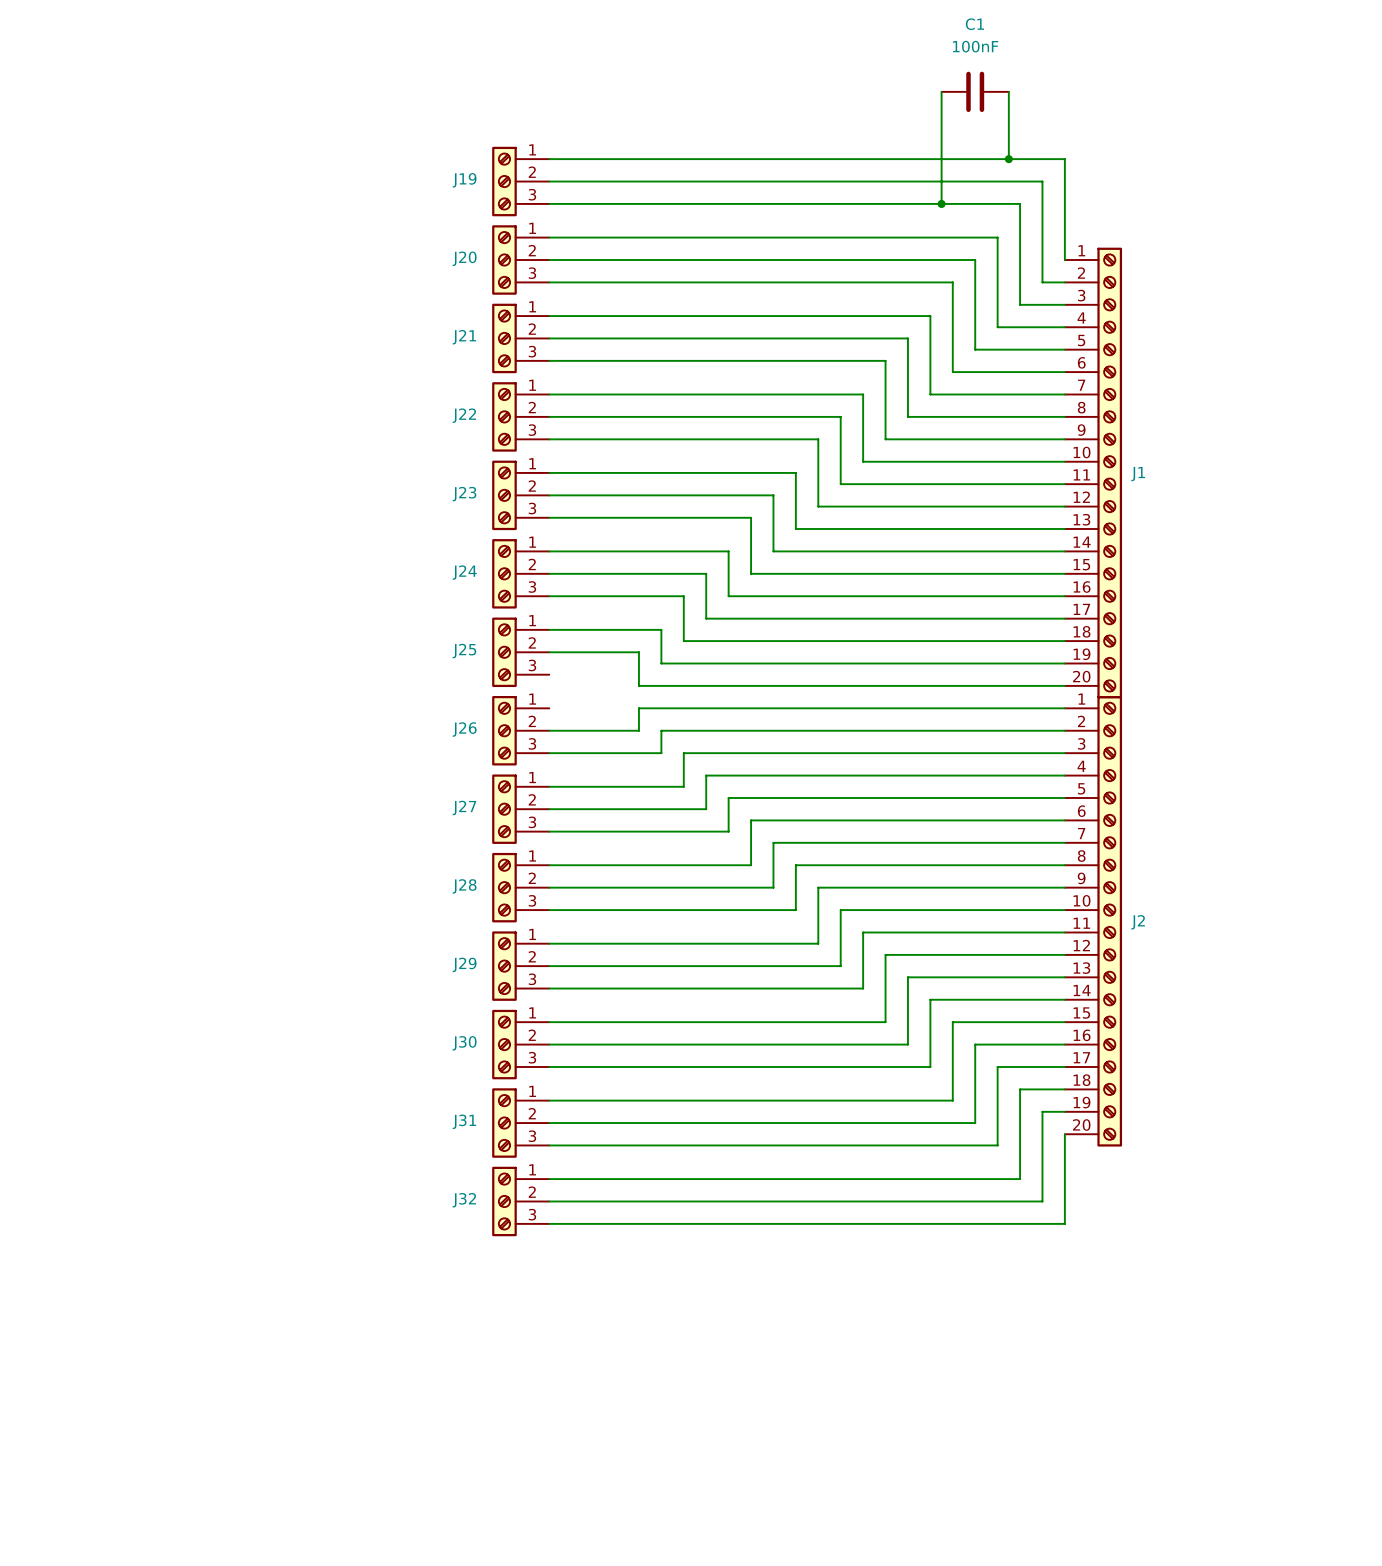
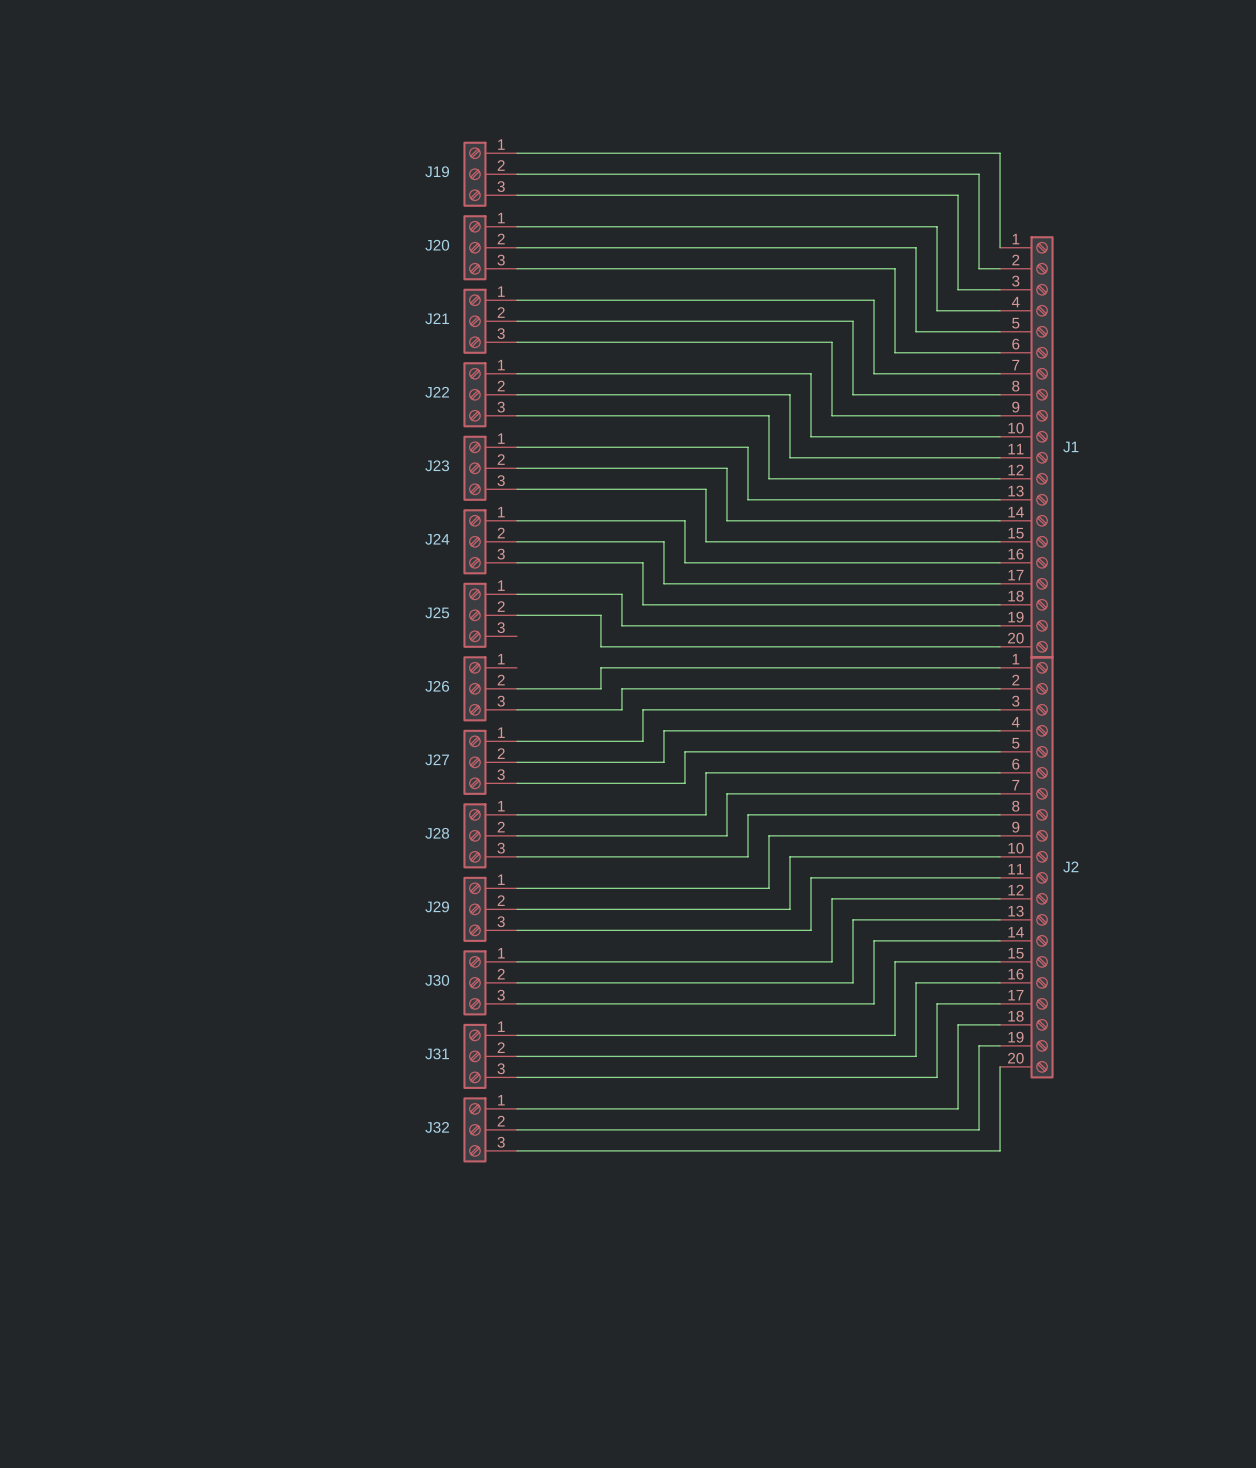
wire: (941, 91) (941, 203) -> none
C1: 100nF (975, 91) -> none
wire: (1008, 91) (1008, 159) -> none
junction: (1008, 159) -> none
junction: (941, 203) -> none

